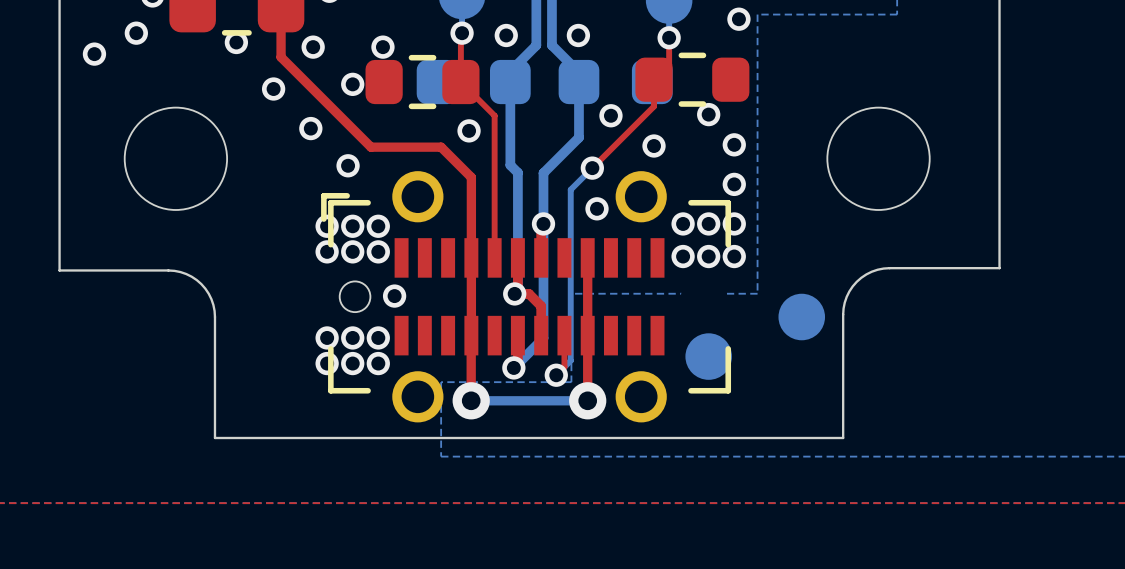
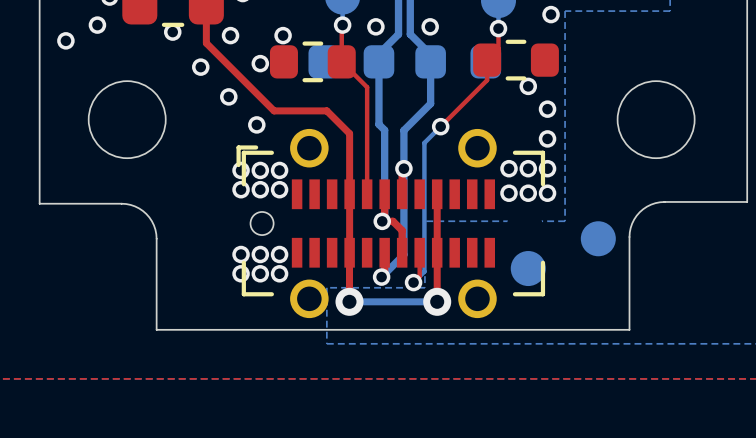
via: (610, 115) -> none
via: (469, 130) -> none
via: (654, 146) -> none
via: (597, 208) -> none
via: (394, 296) -> none

